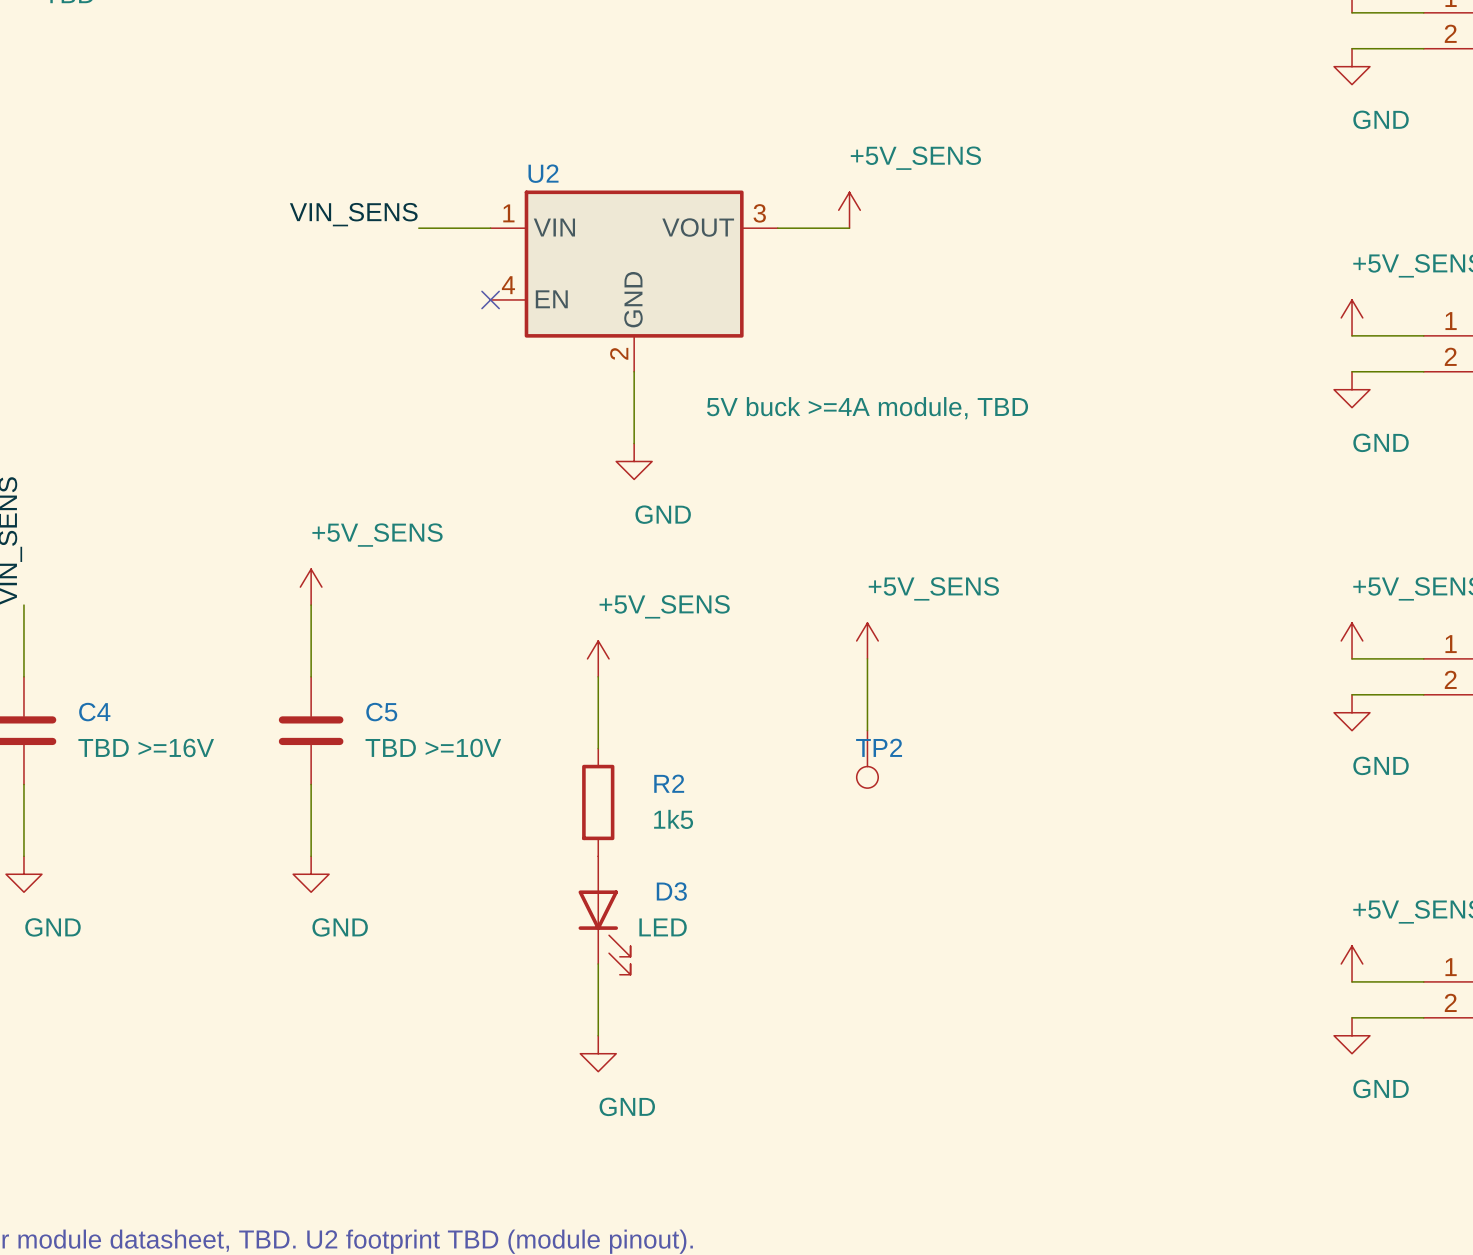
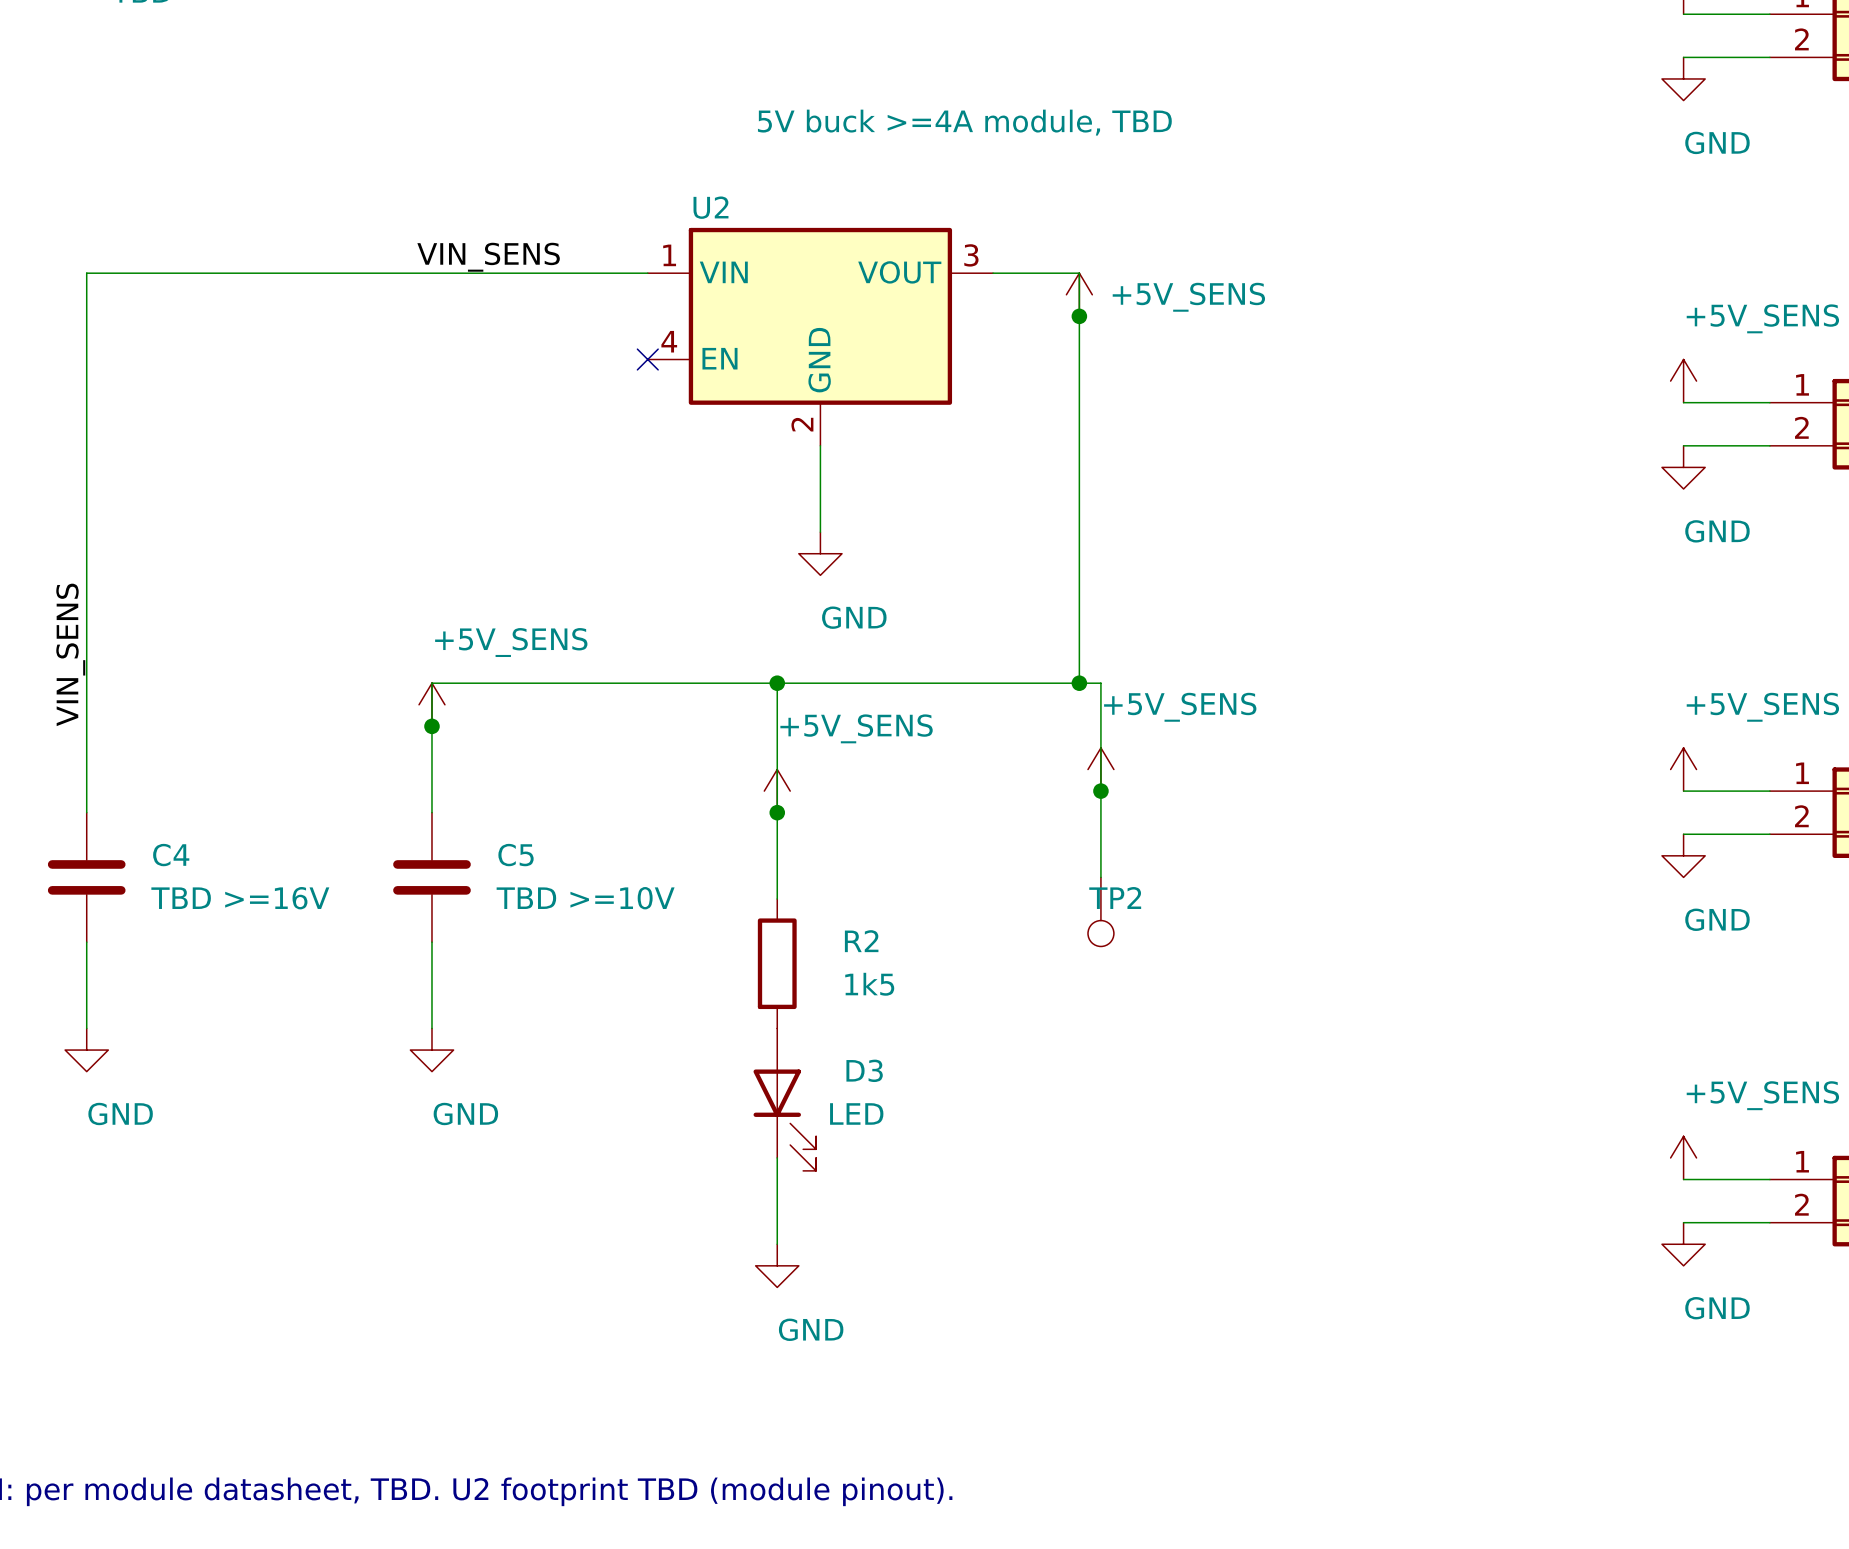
power symbol text position: +5V_SENS (915, 158) -> +5V_SENS (1188, 297)
power symbol position: +5V_SENS (849, 210) -> +5V_SENS (1079, 294)
wire: none -> (561, 273) (86, 273) (86, 726)
wire: none -> (1079, 273) (1079, 683)
junction: none -> (1079, 316)
U2 value position: 5V buck >=4A module, TBD (867, 408) -> 5V buck >=4A module, TBD (964, 122)
wire: none -> (777, 683) (777, 812)
junction: none -> (777, 683)
junction: none -> (1079, 683)
wire: none -> (431, 726) (431, 683) (1100, 683) (1100, 791)
junction: none -> (431, 726)
junction: none -> (1100, 791)
junction: none -> (777, 812)

